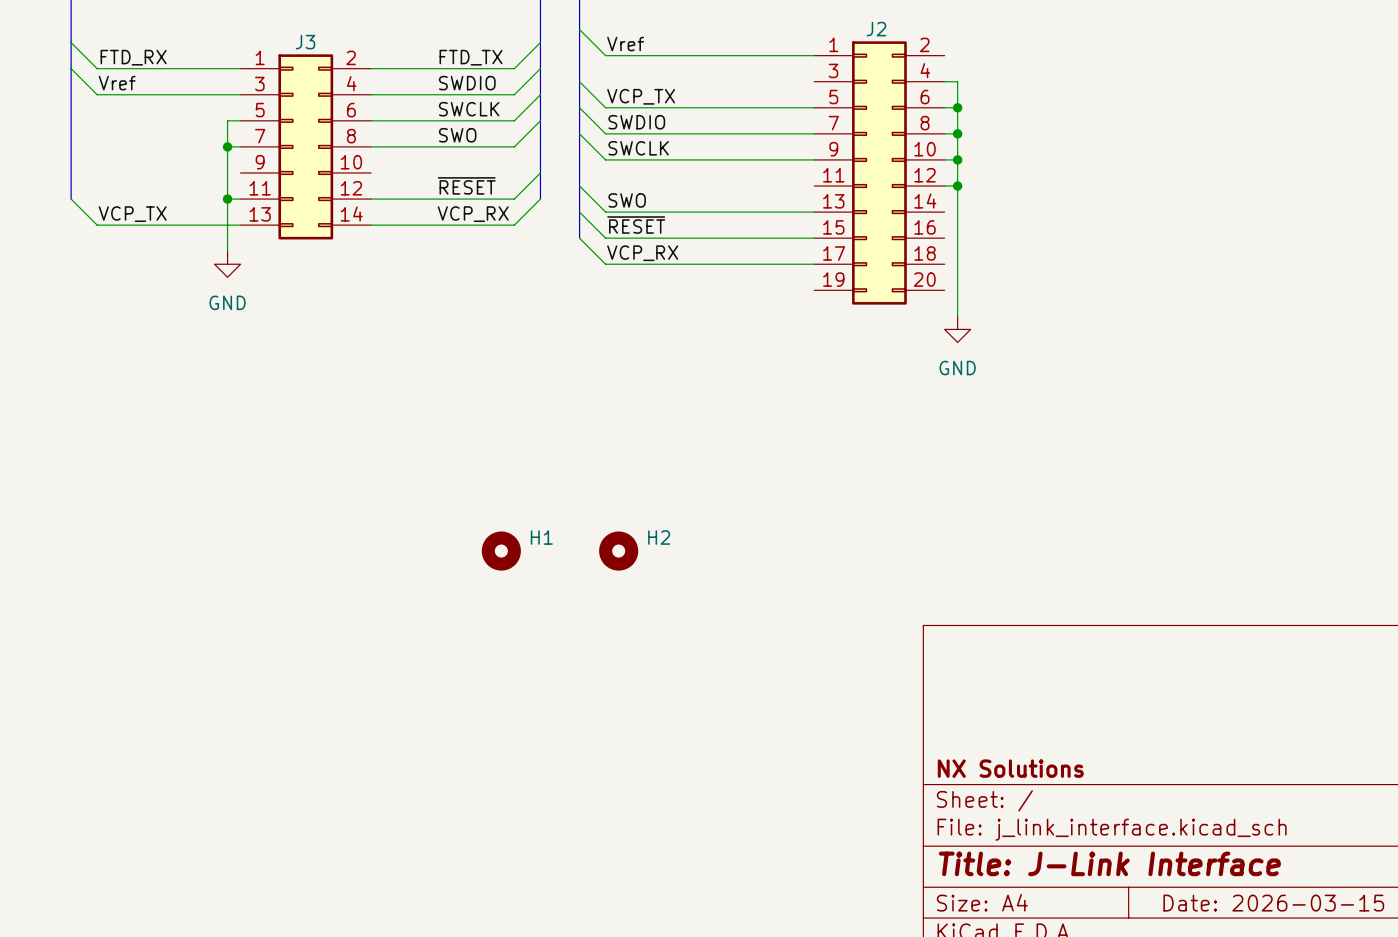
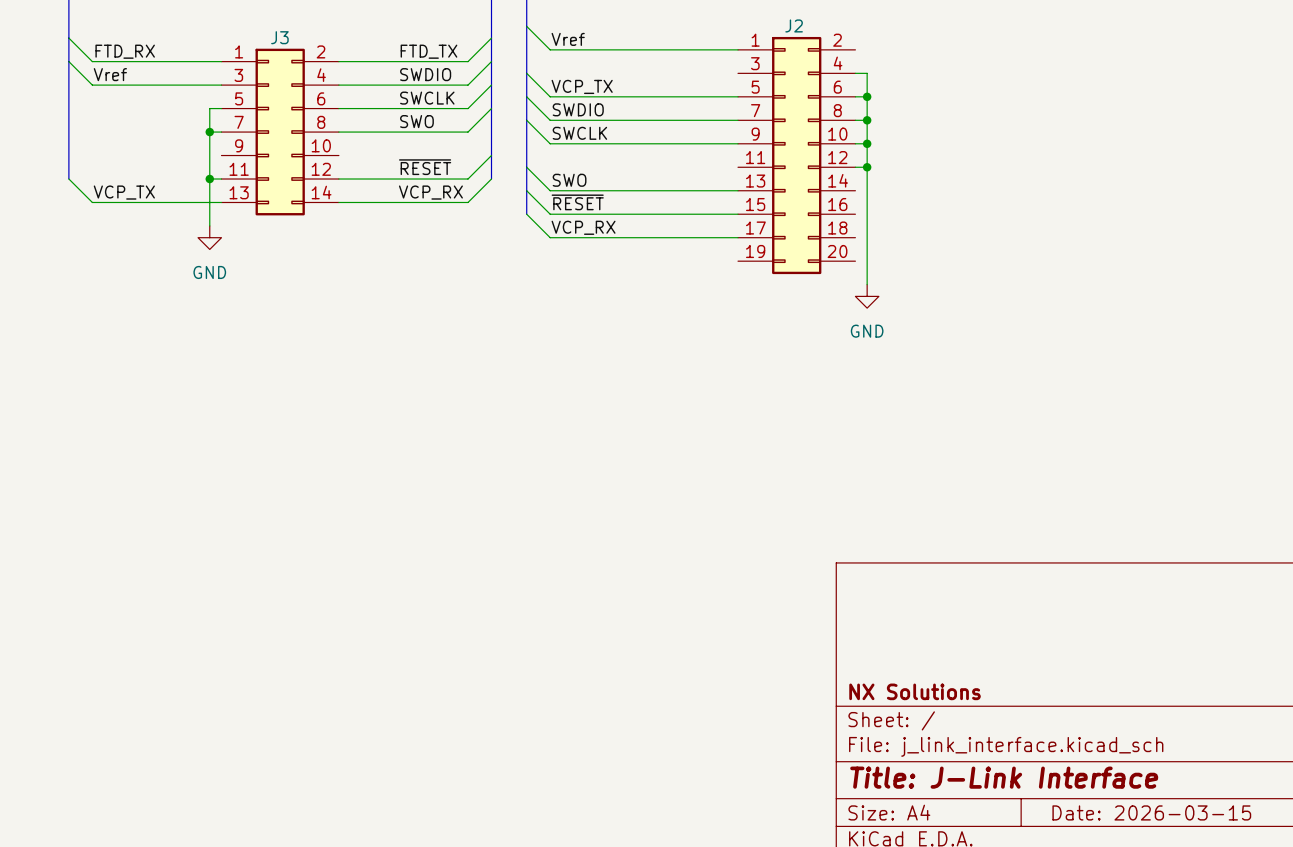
H1: (501, 551) -> none
H2: (618, 551) -> none

